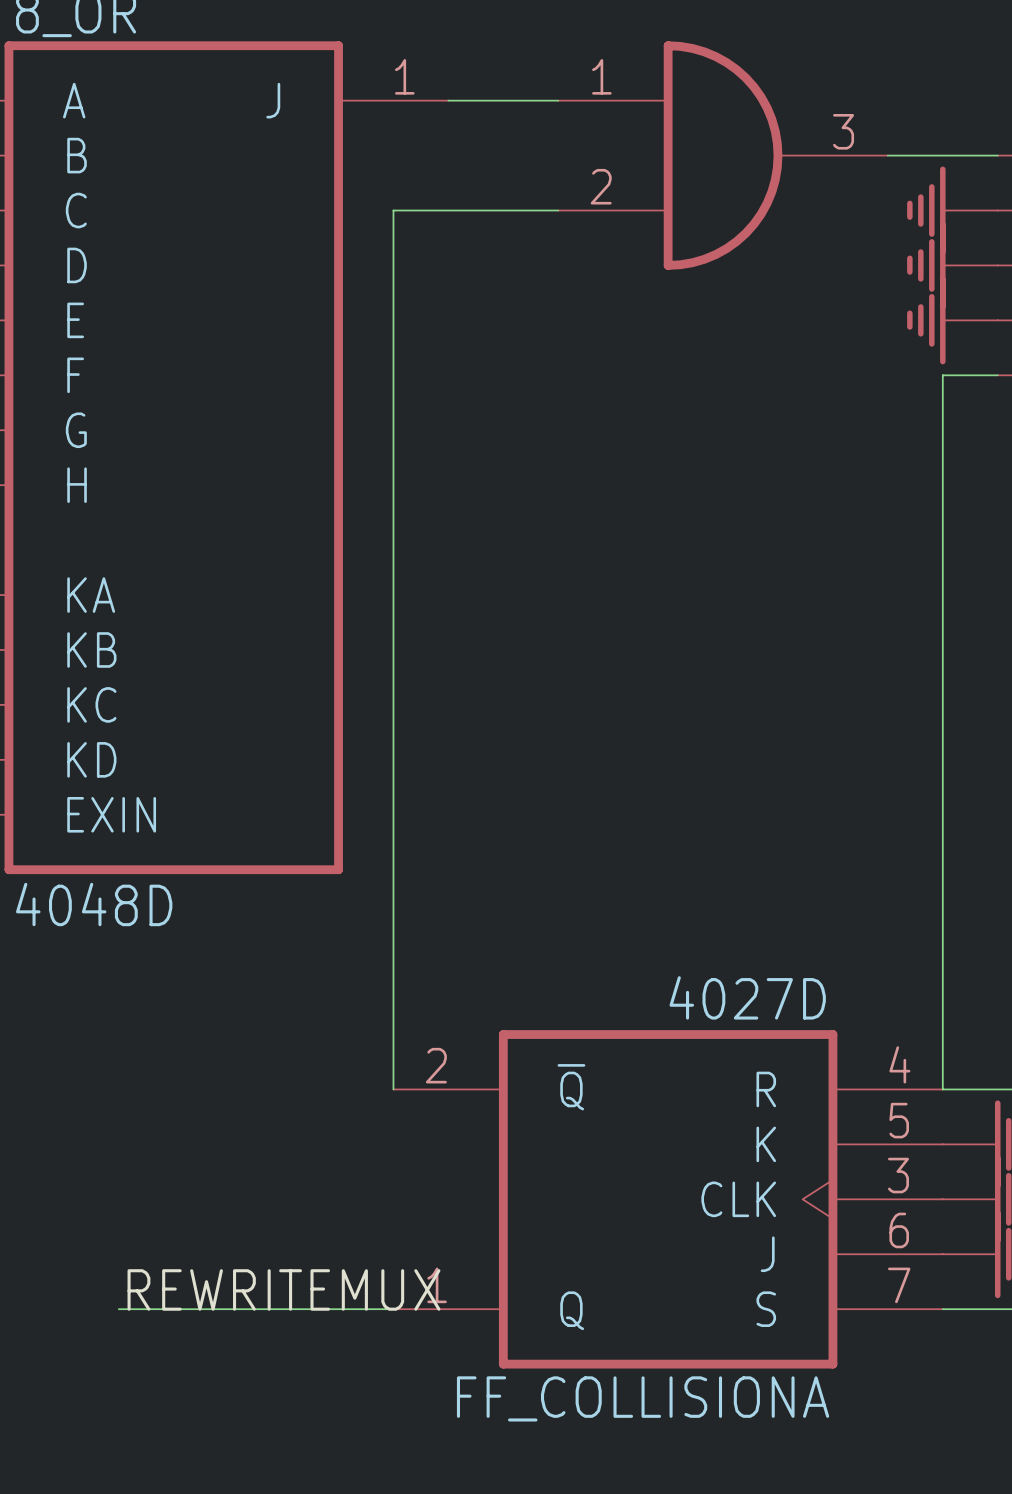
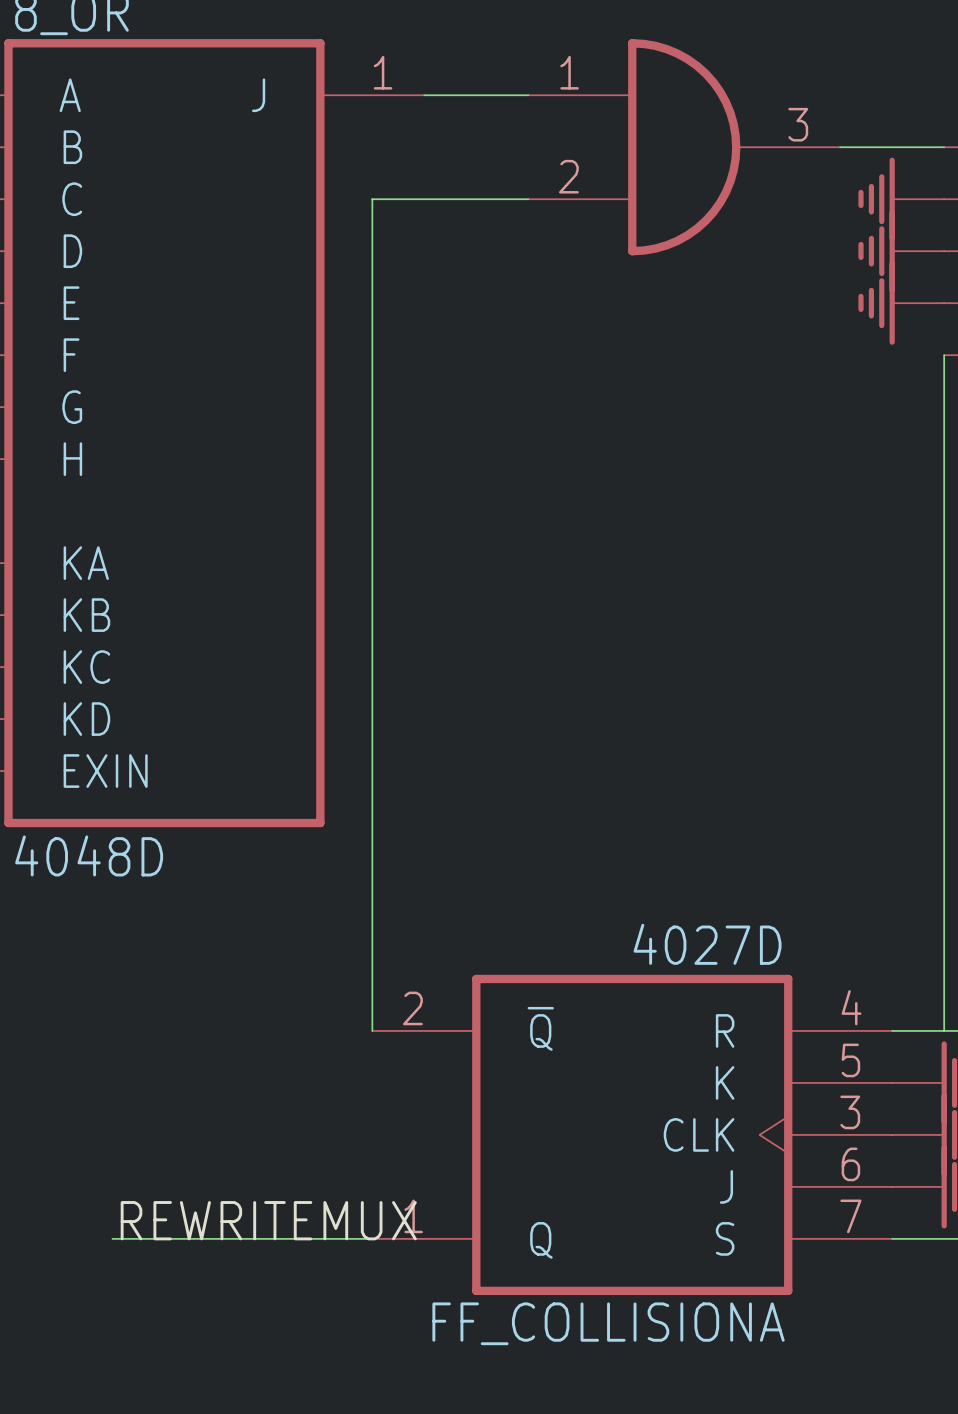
wire: (997, 375) (942, 375) (942, 1089) -> (944, 355) (944, 1030)

